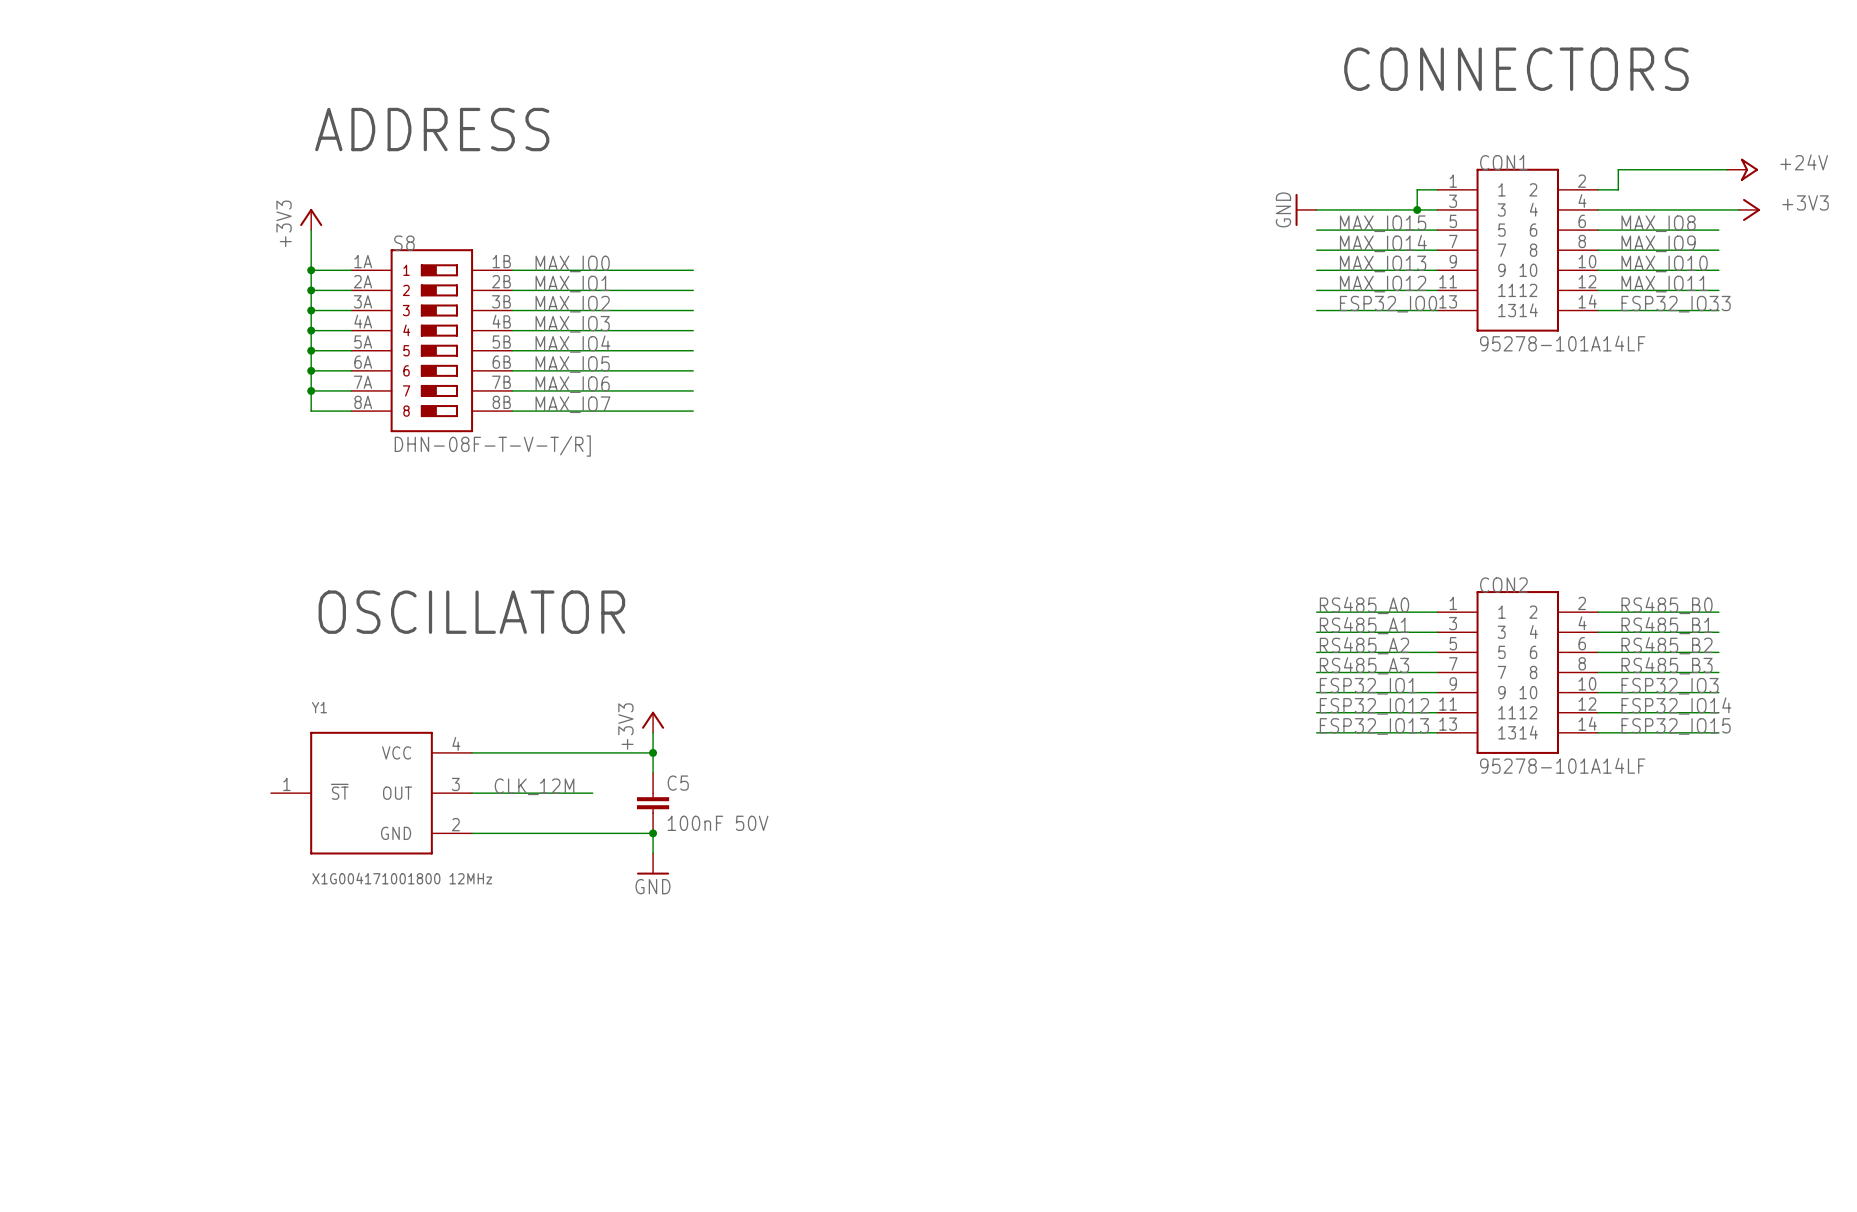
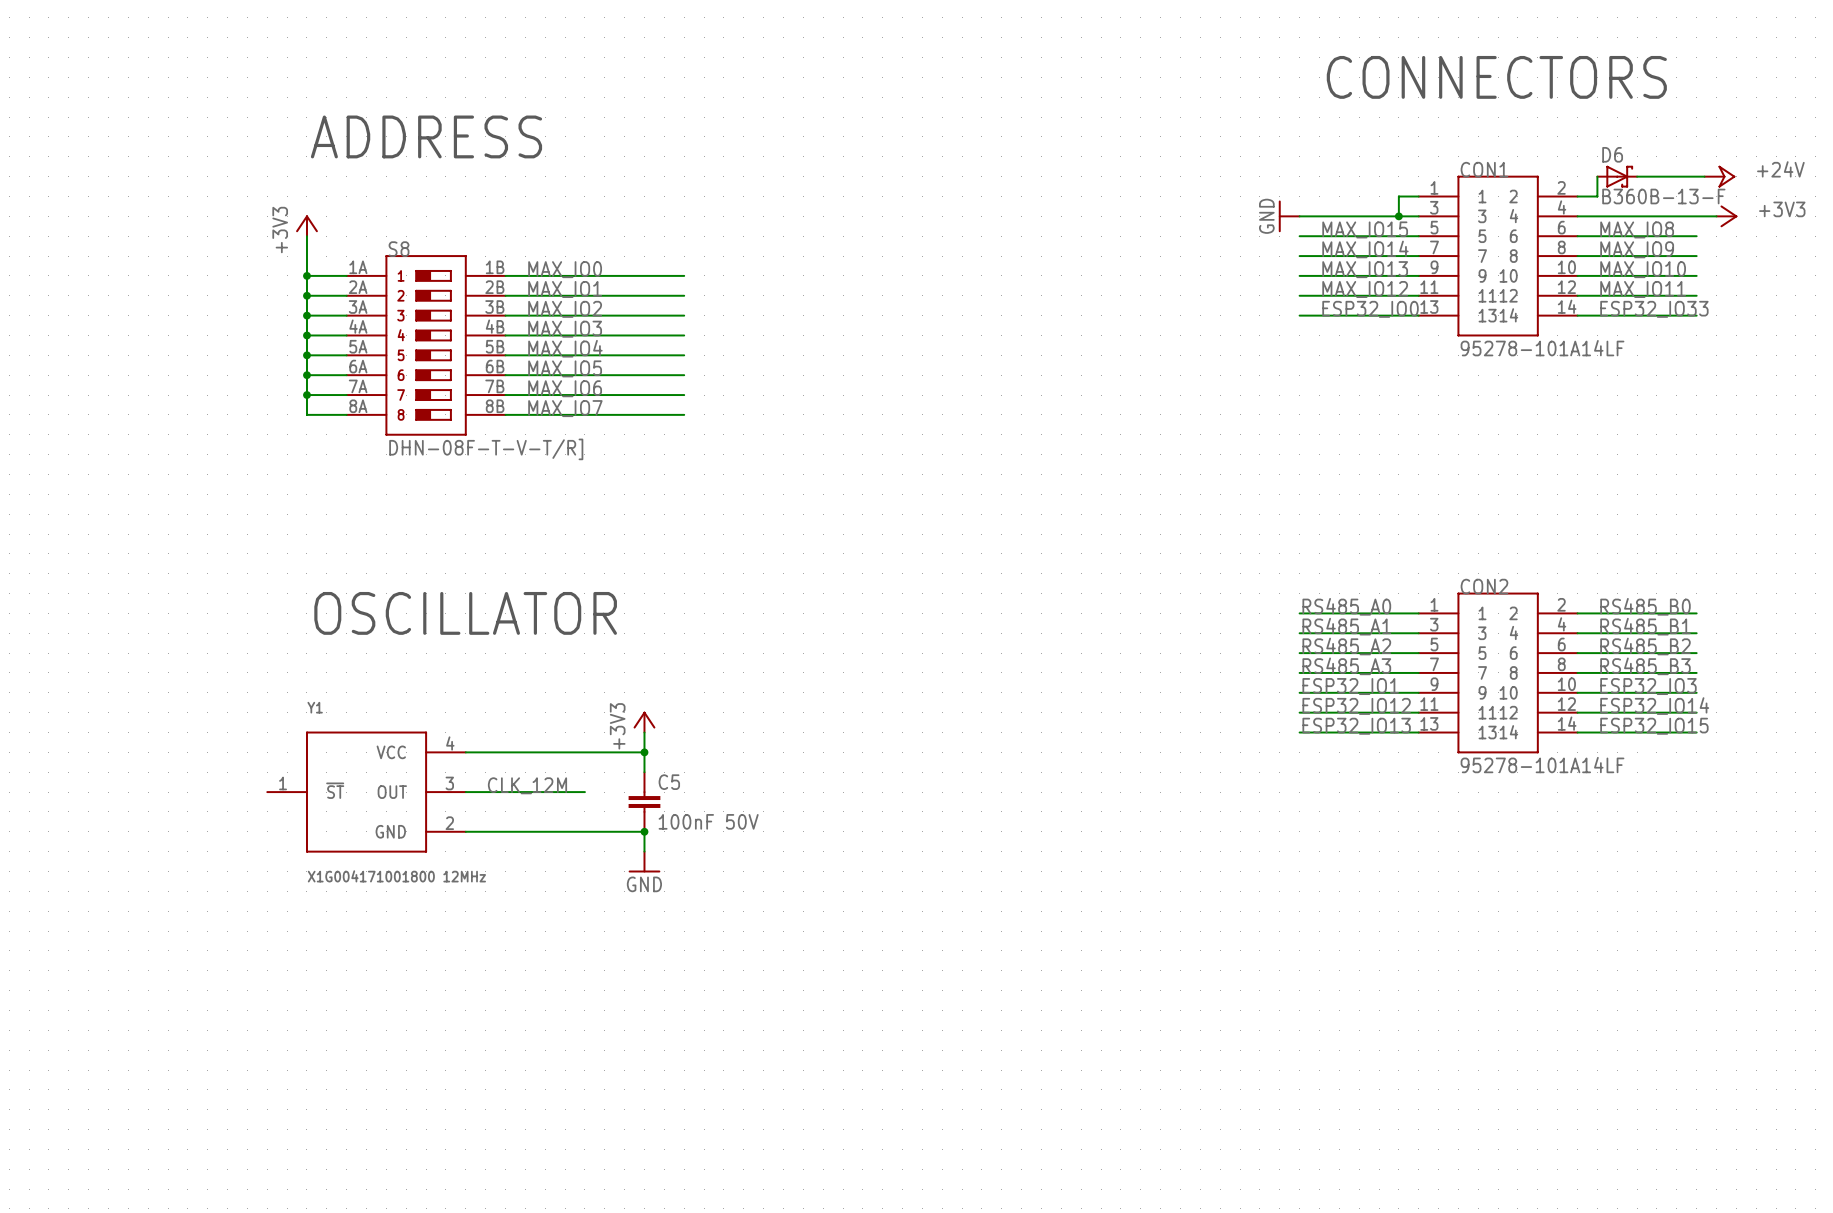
D6: none -> B360B-13-F (1617, 176)

